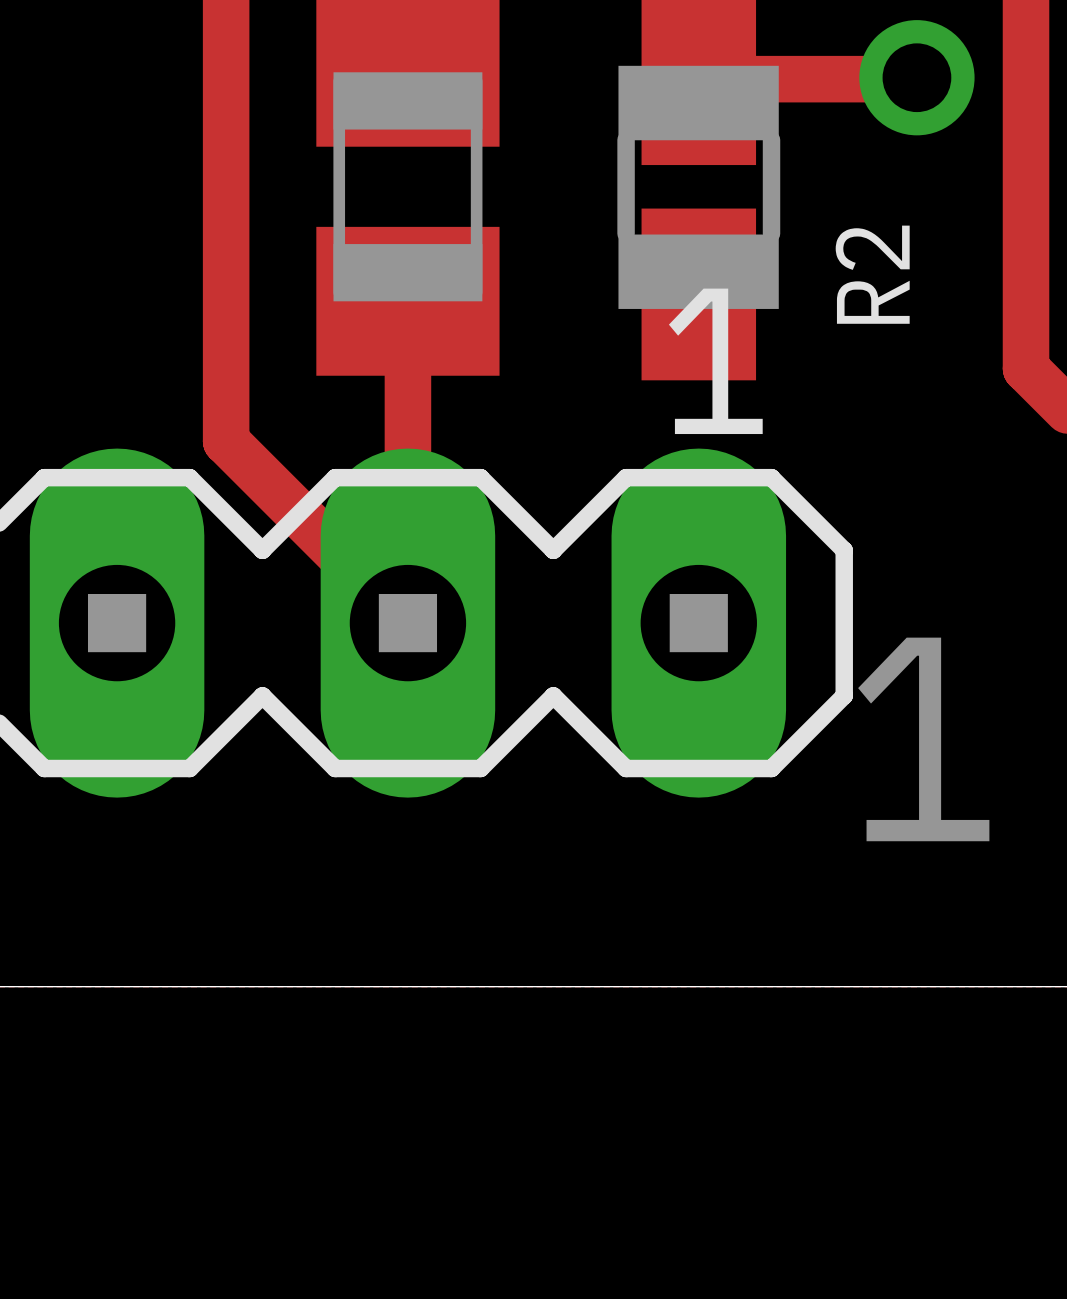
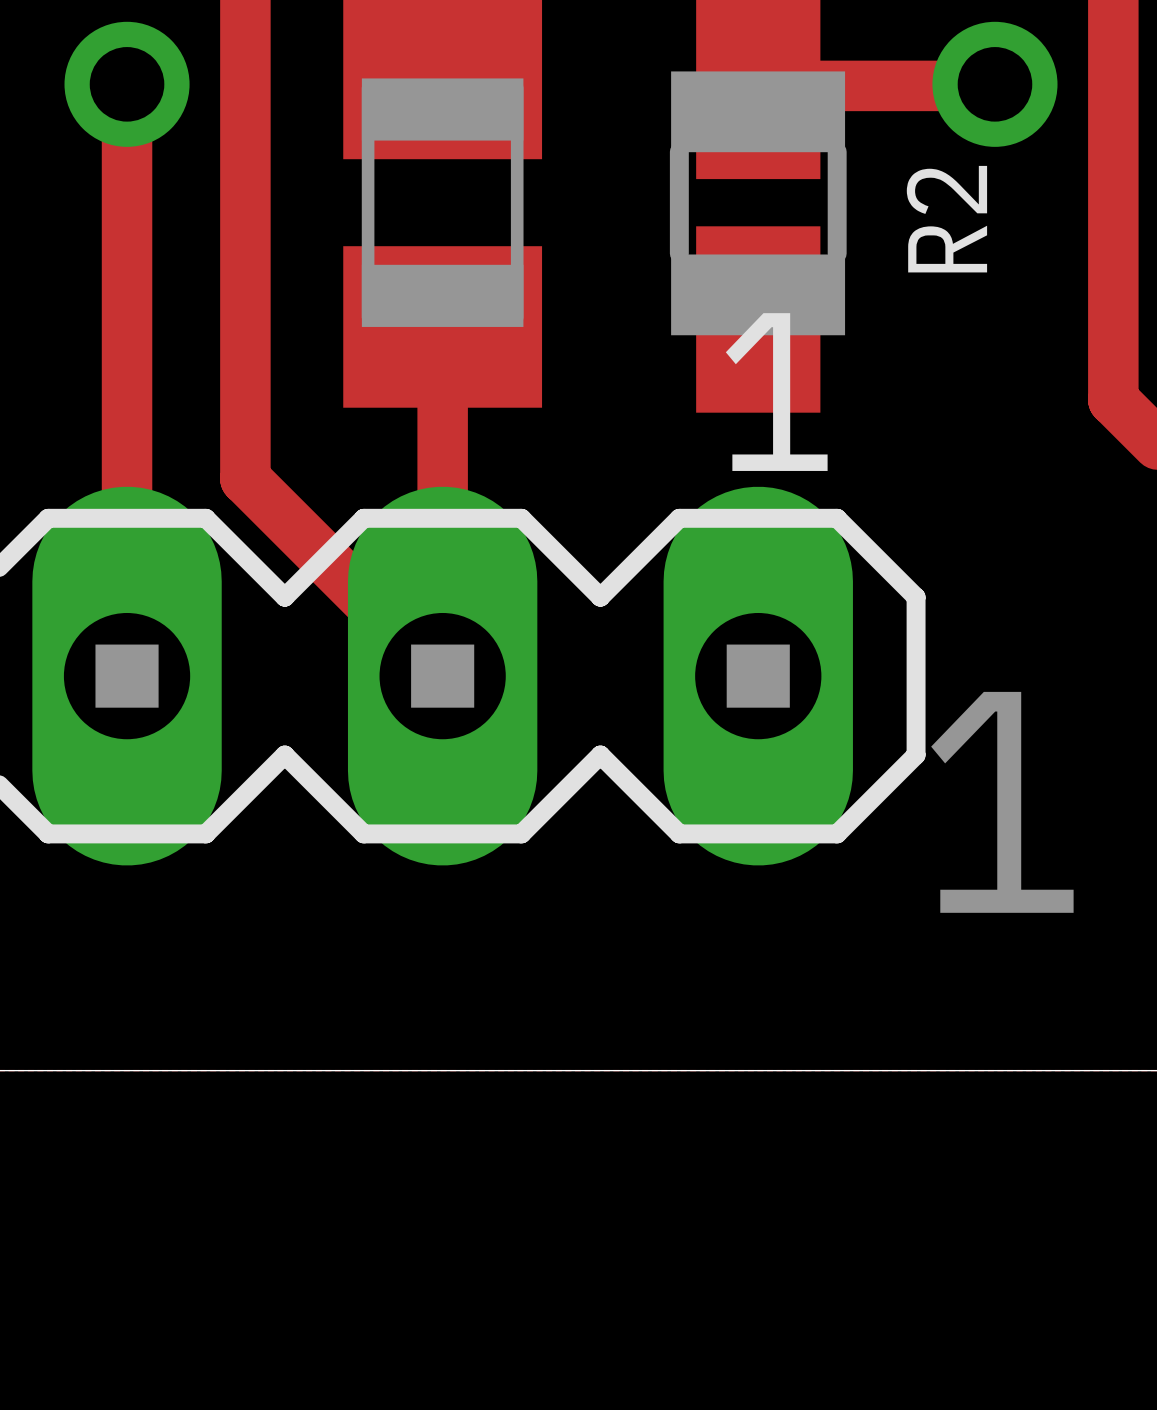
track: none -> (127, 84) (127, 676)
via: none -> (127, 84)
R2 name position: R2 (872, 274) -> R2 (946, 219)

